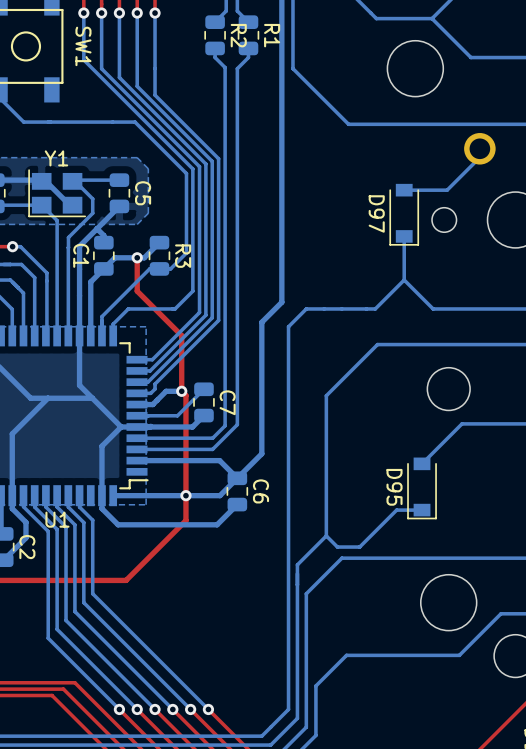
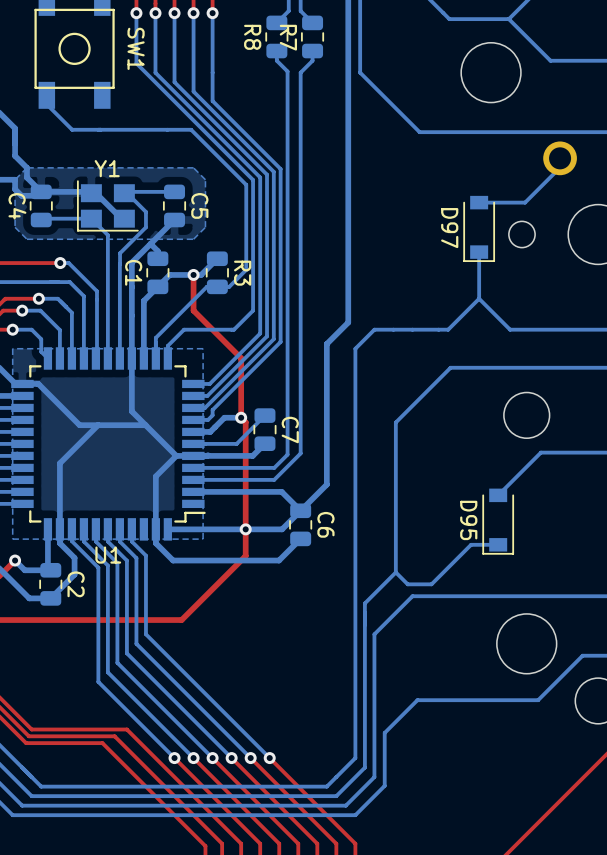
R2 name: R2 (238, 35) -> R8 (252, 37)
R1 name: R1 (272, 35) -> R7 (288, 37)

